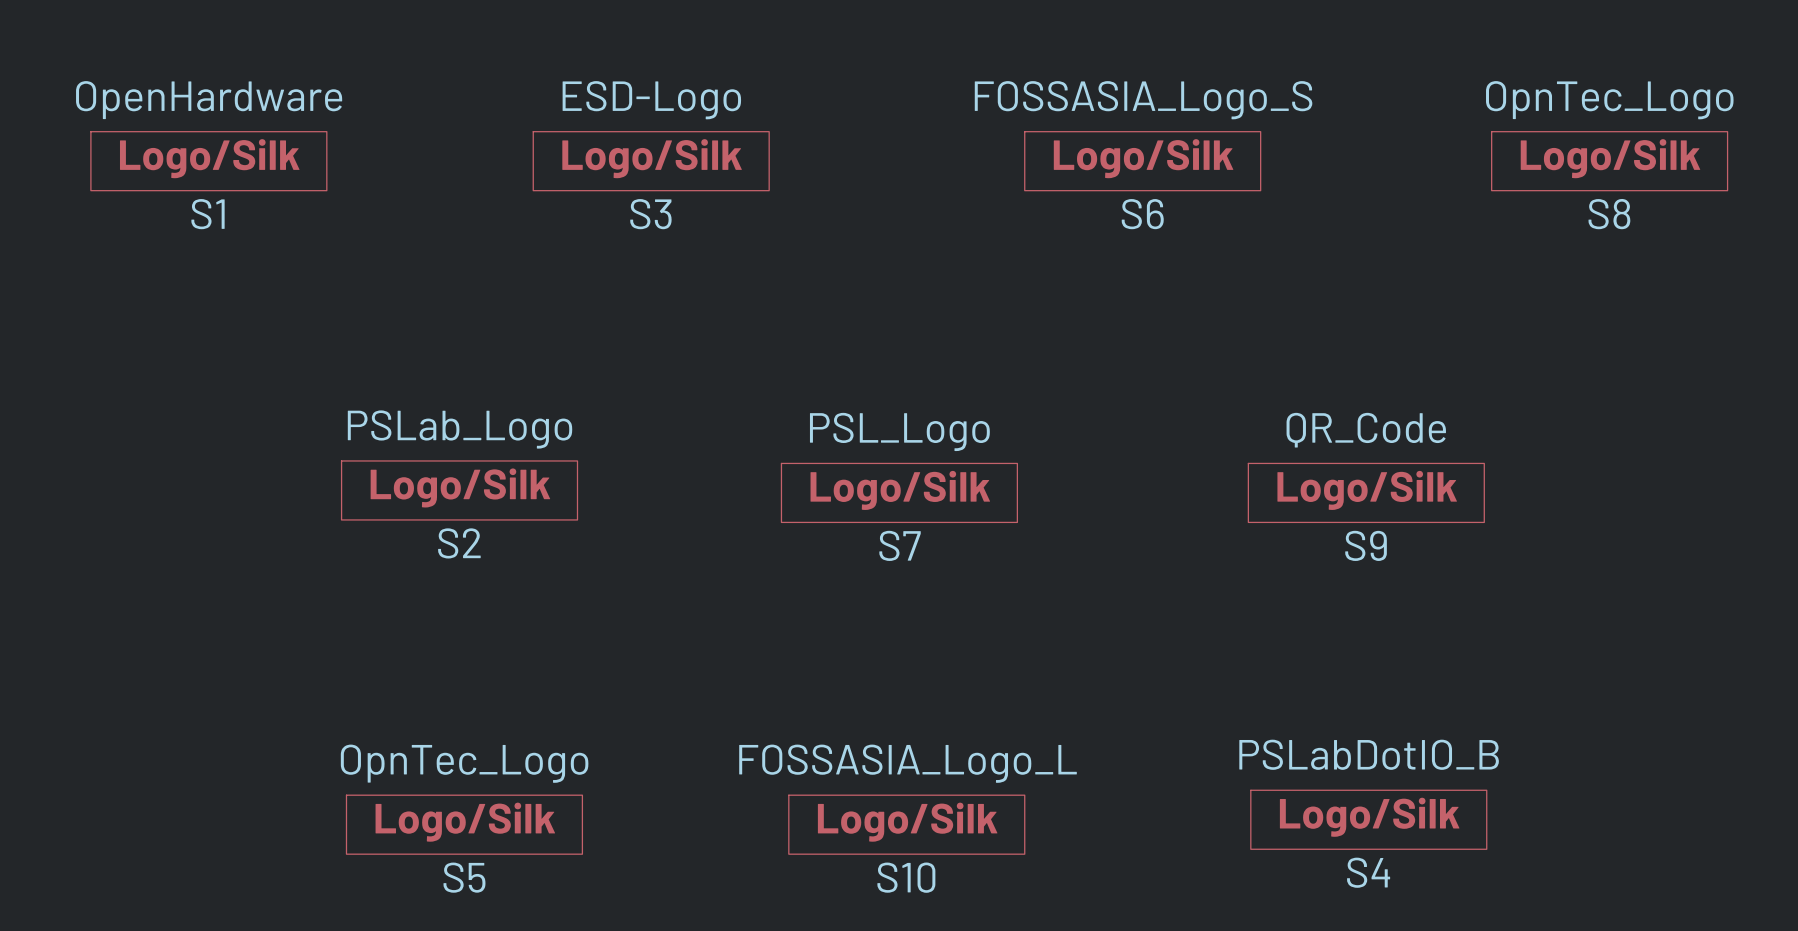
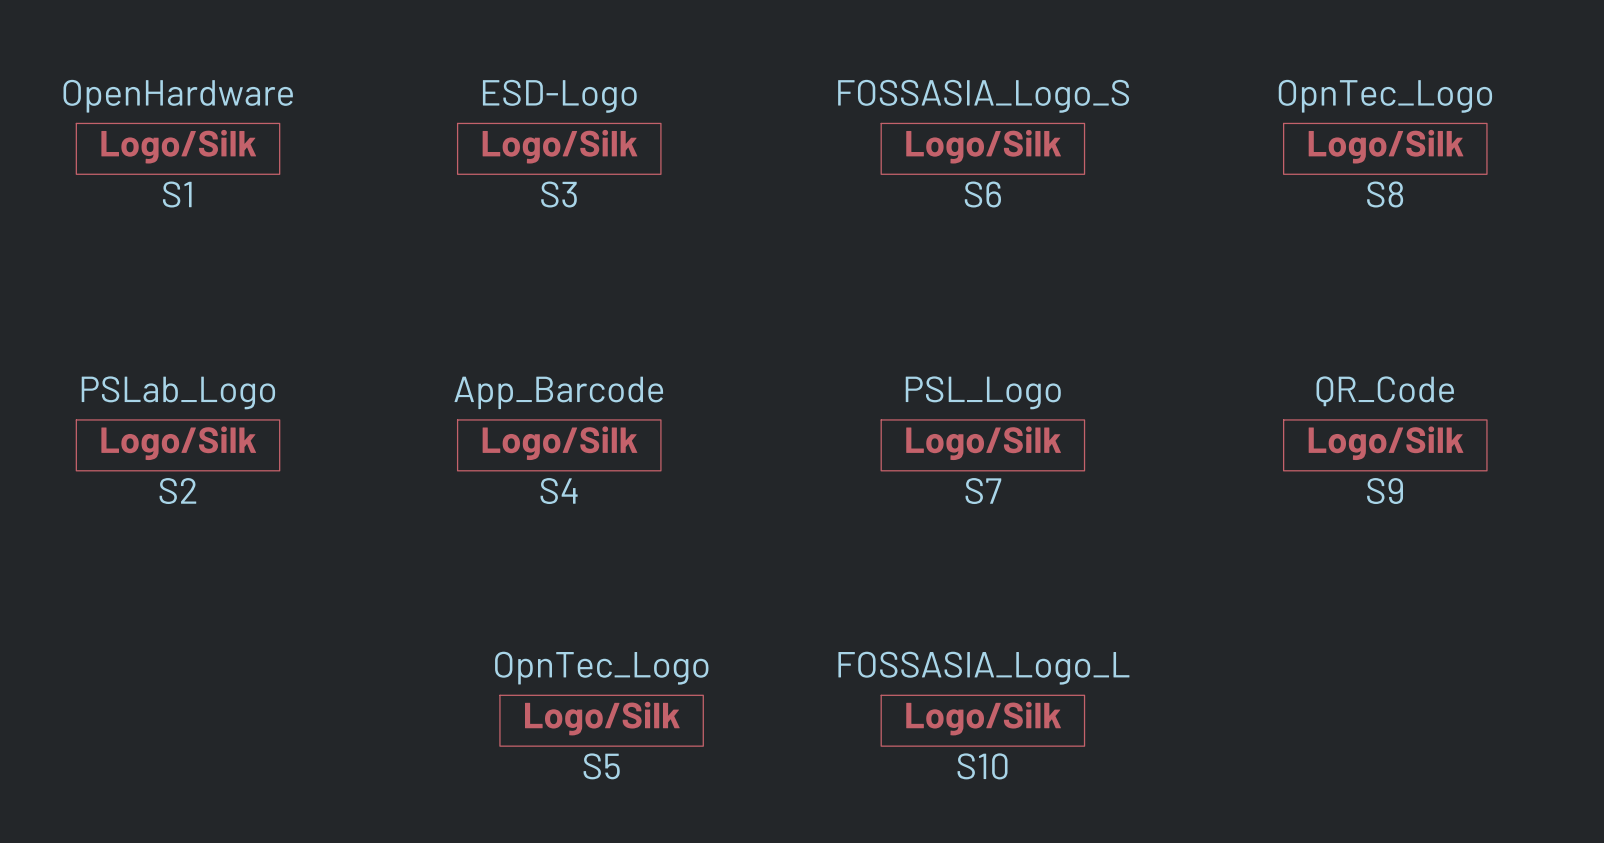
S2 position: (459, 490) -> (178, 445)
S7 position: (899, 492) -> (982, 445)
S9 position: (1366, 492) -> (1385, 445)
S4 value: PSLabDotIO_B (1369, 754) -> App_Barcode (558, 392)
S4 position: (1368, 819) -> (559, 445)
S5 position: (464, 824) -> (601, 720)
S10 position: (906, 824) -> (982, 720)

